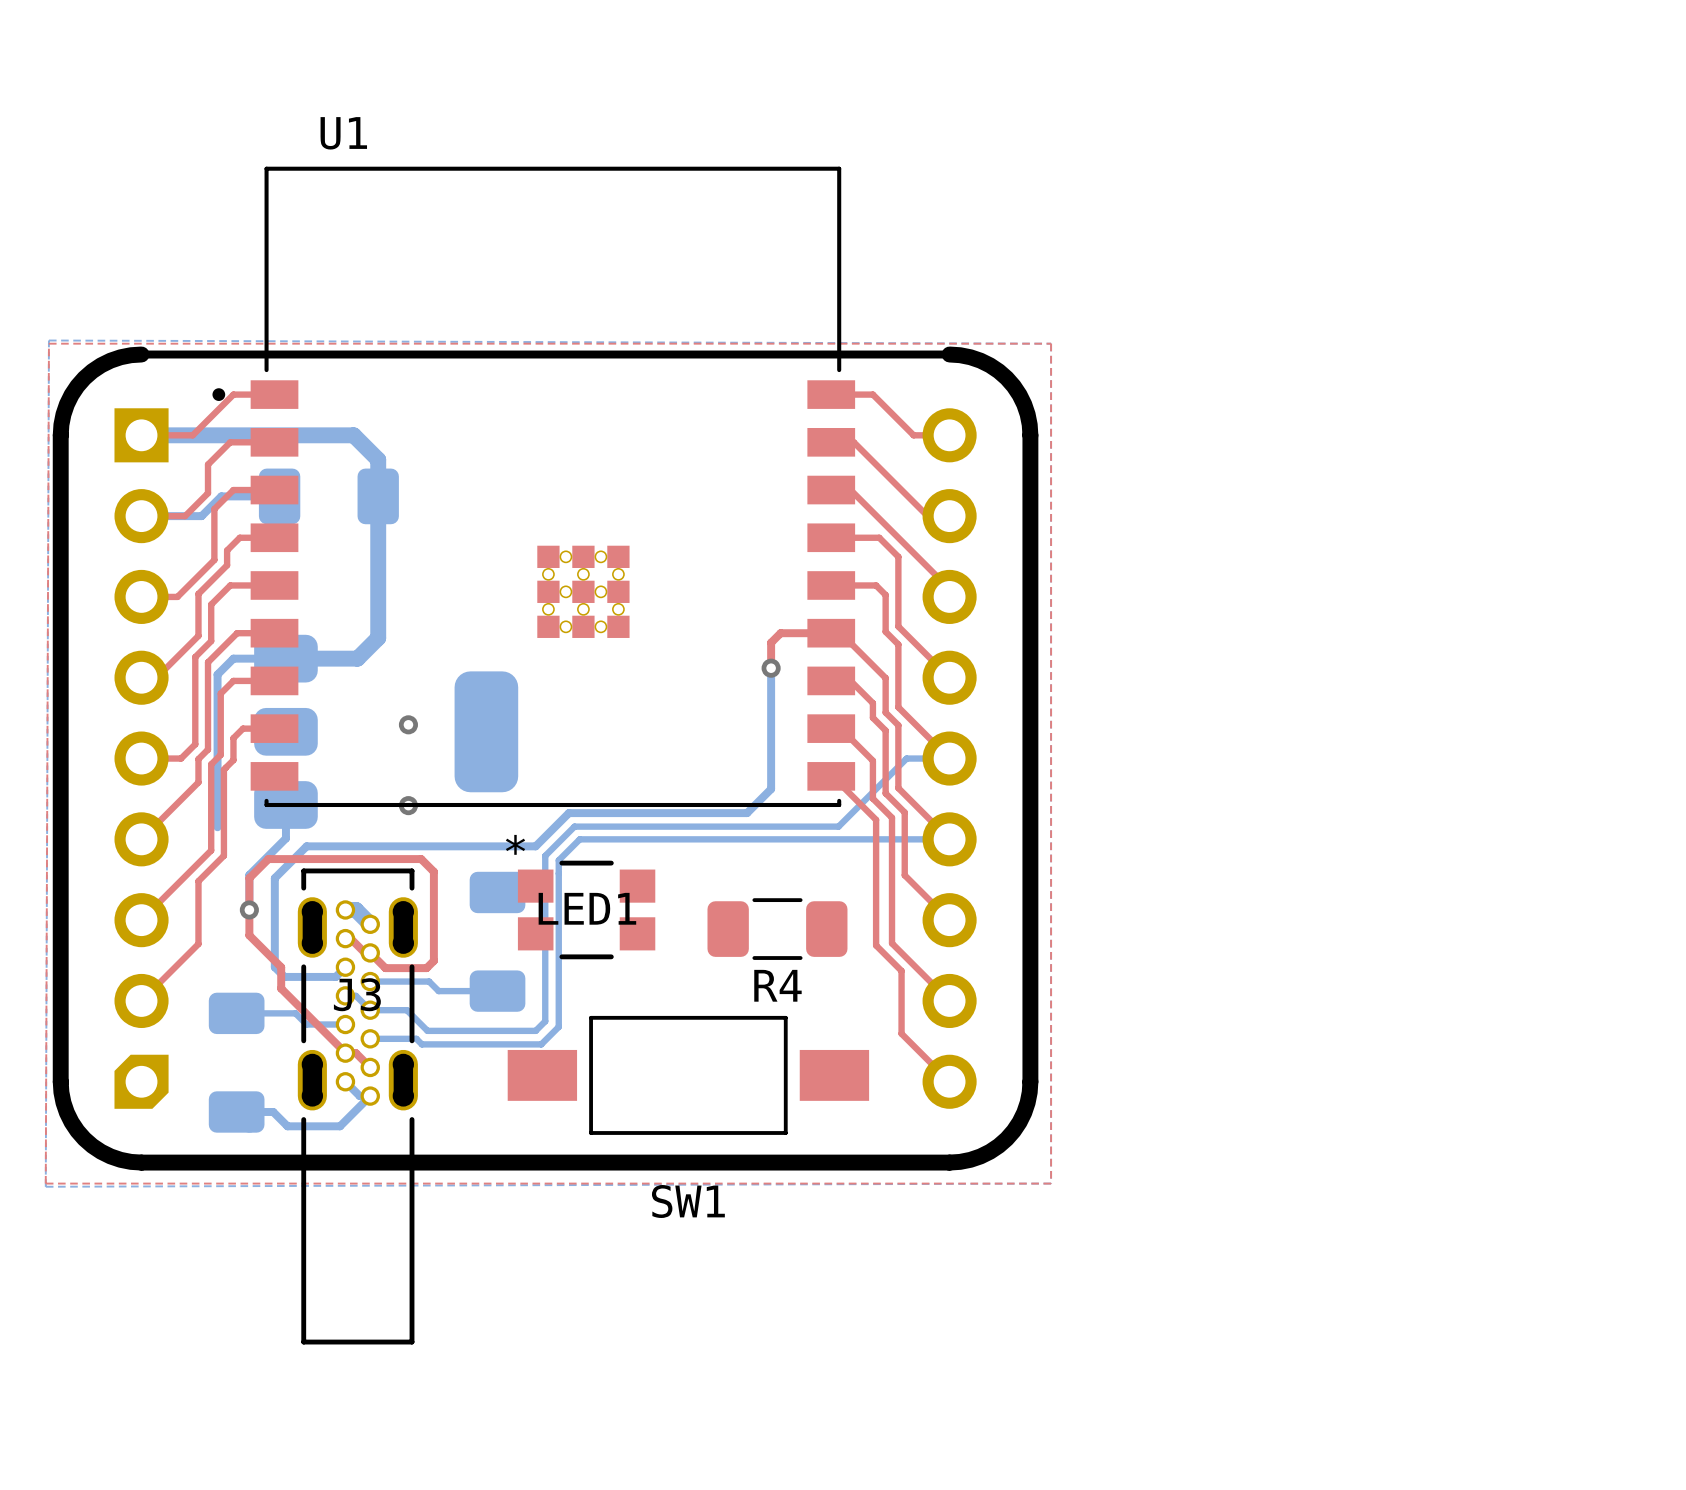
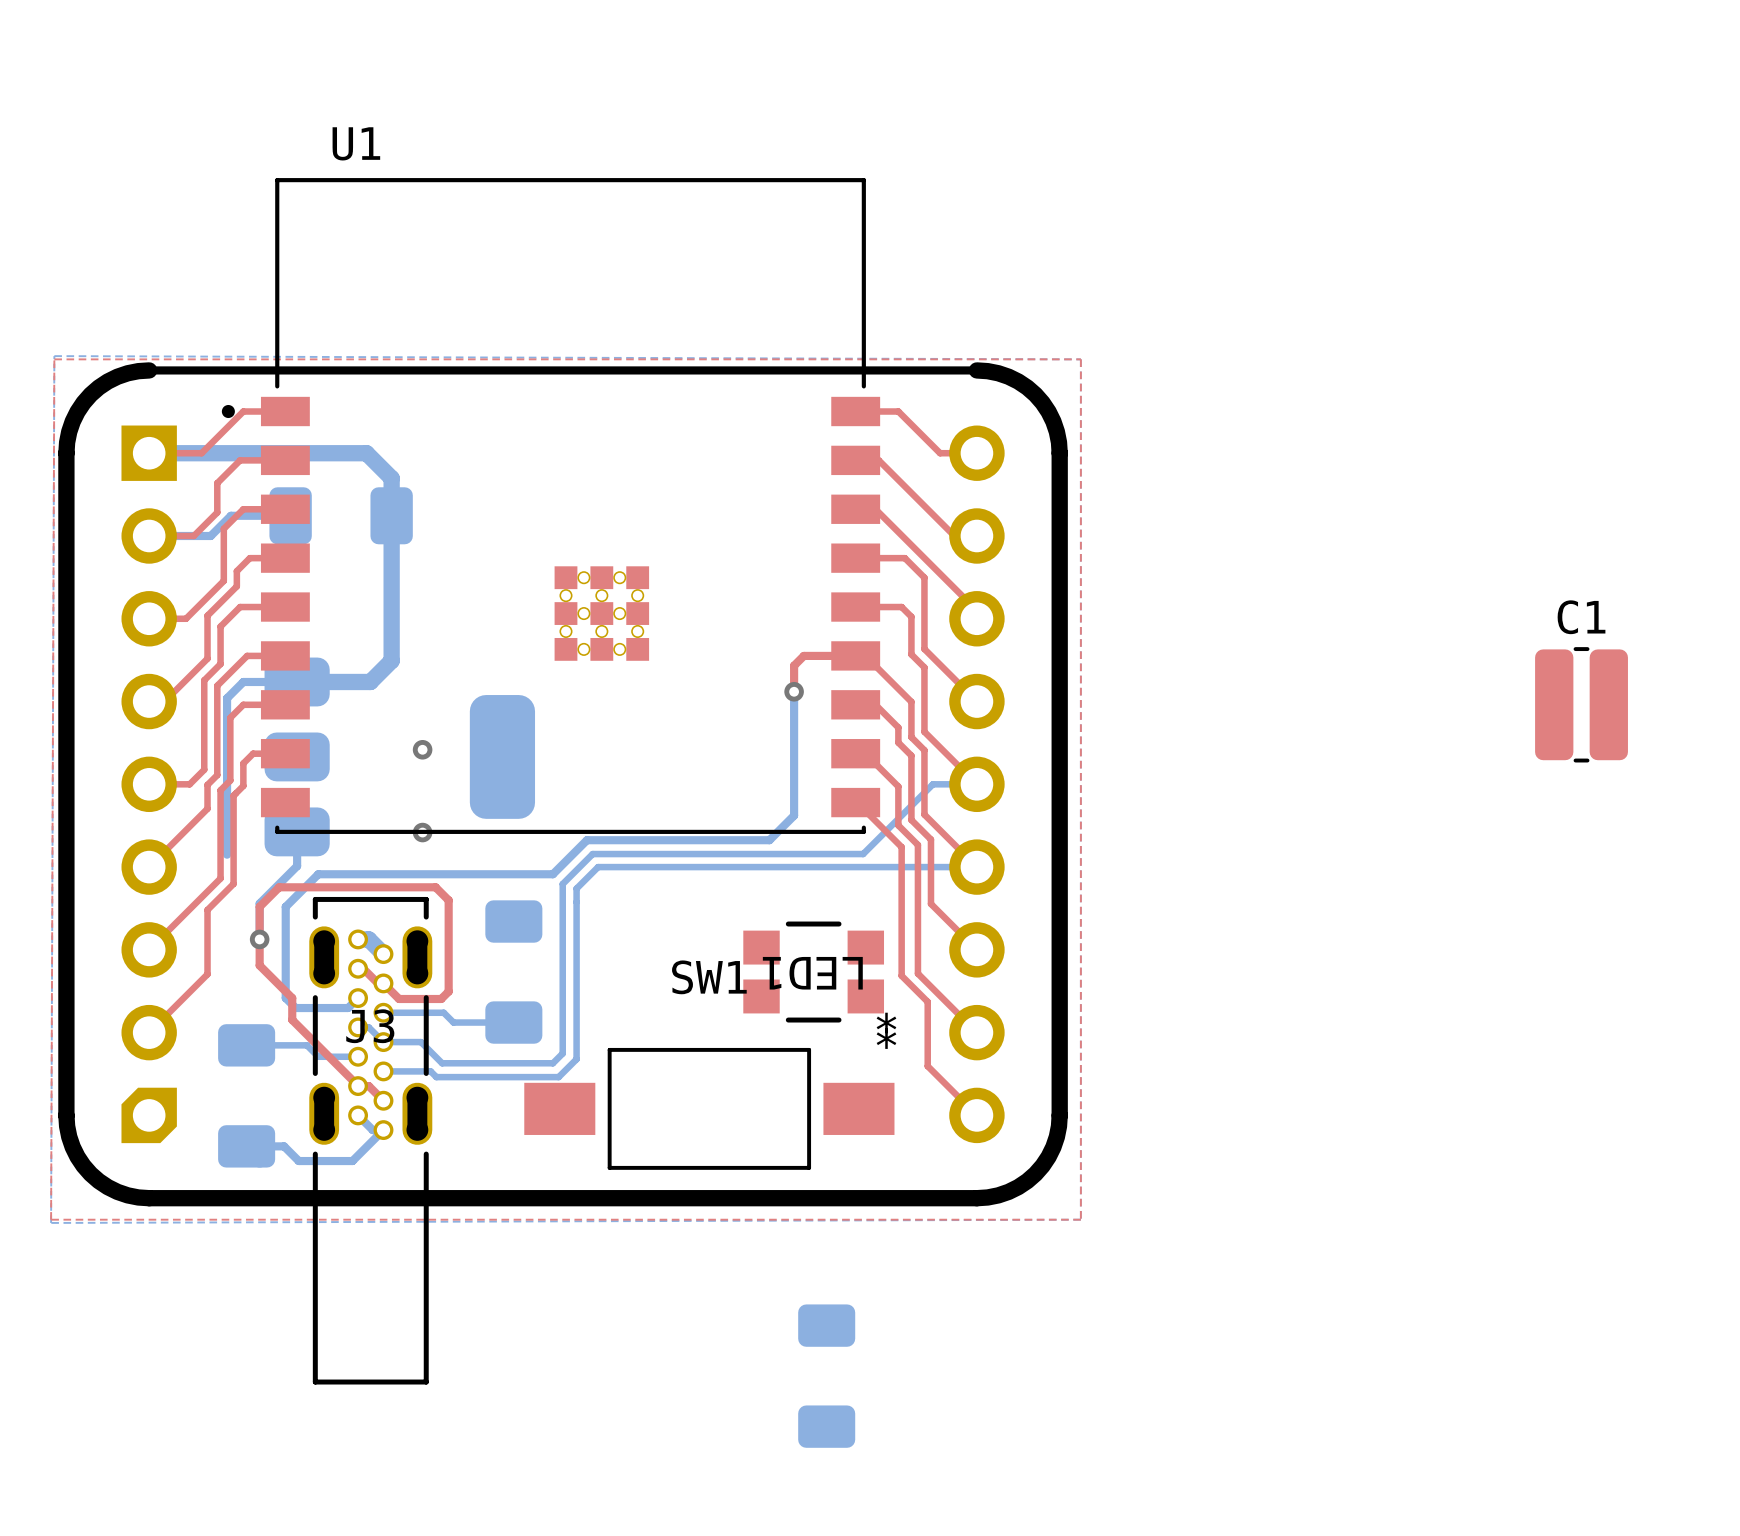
C1: none -> (1581, 704)
LED1 rotation: 0° (586, 909) -> 180° (813, 972)
LED1 position: (586, 909) -> (813, 972)
R4 side: top (777, 929) -> bottom (826, 1376)
SW1 name position: SW1 (688, 1201) -> SW1 (709, 977)

